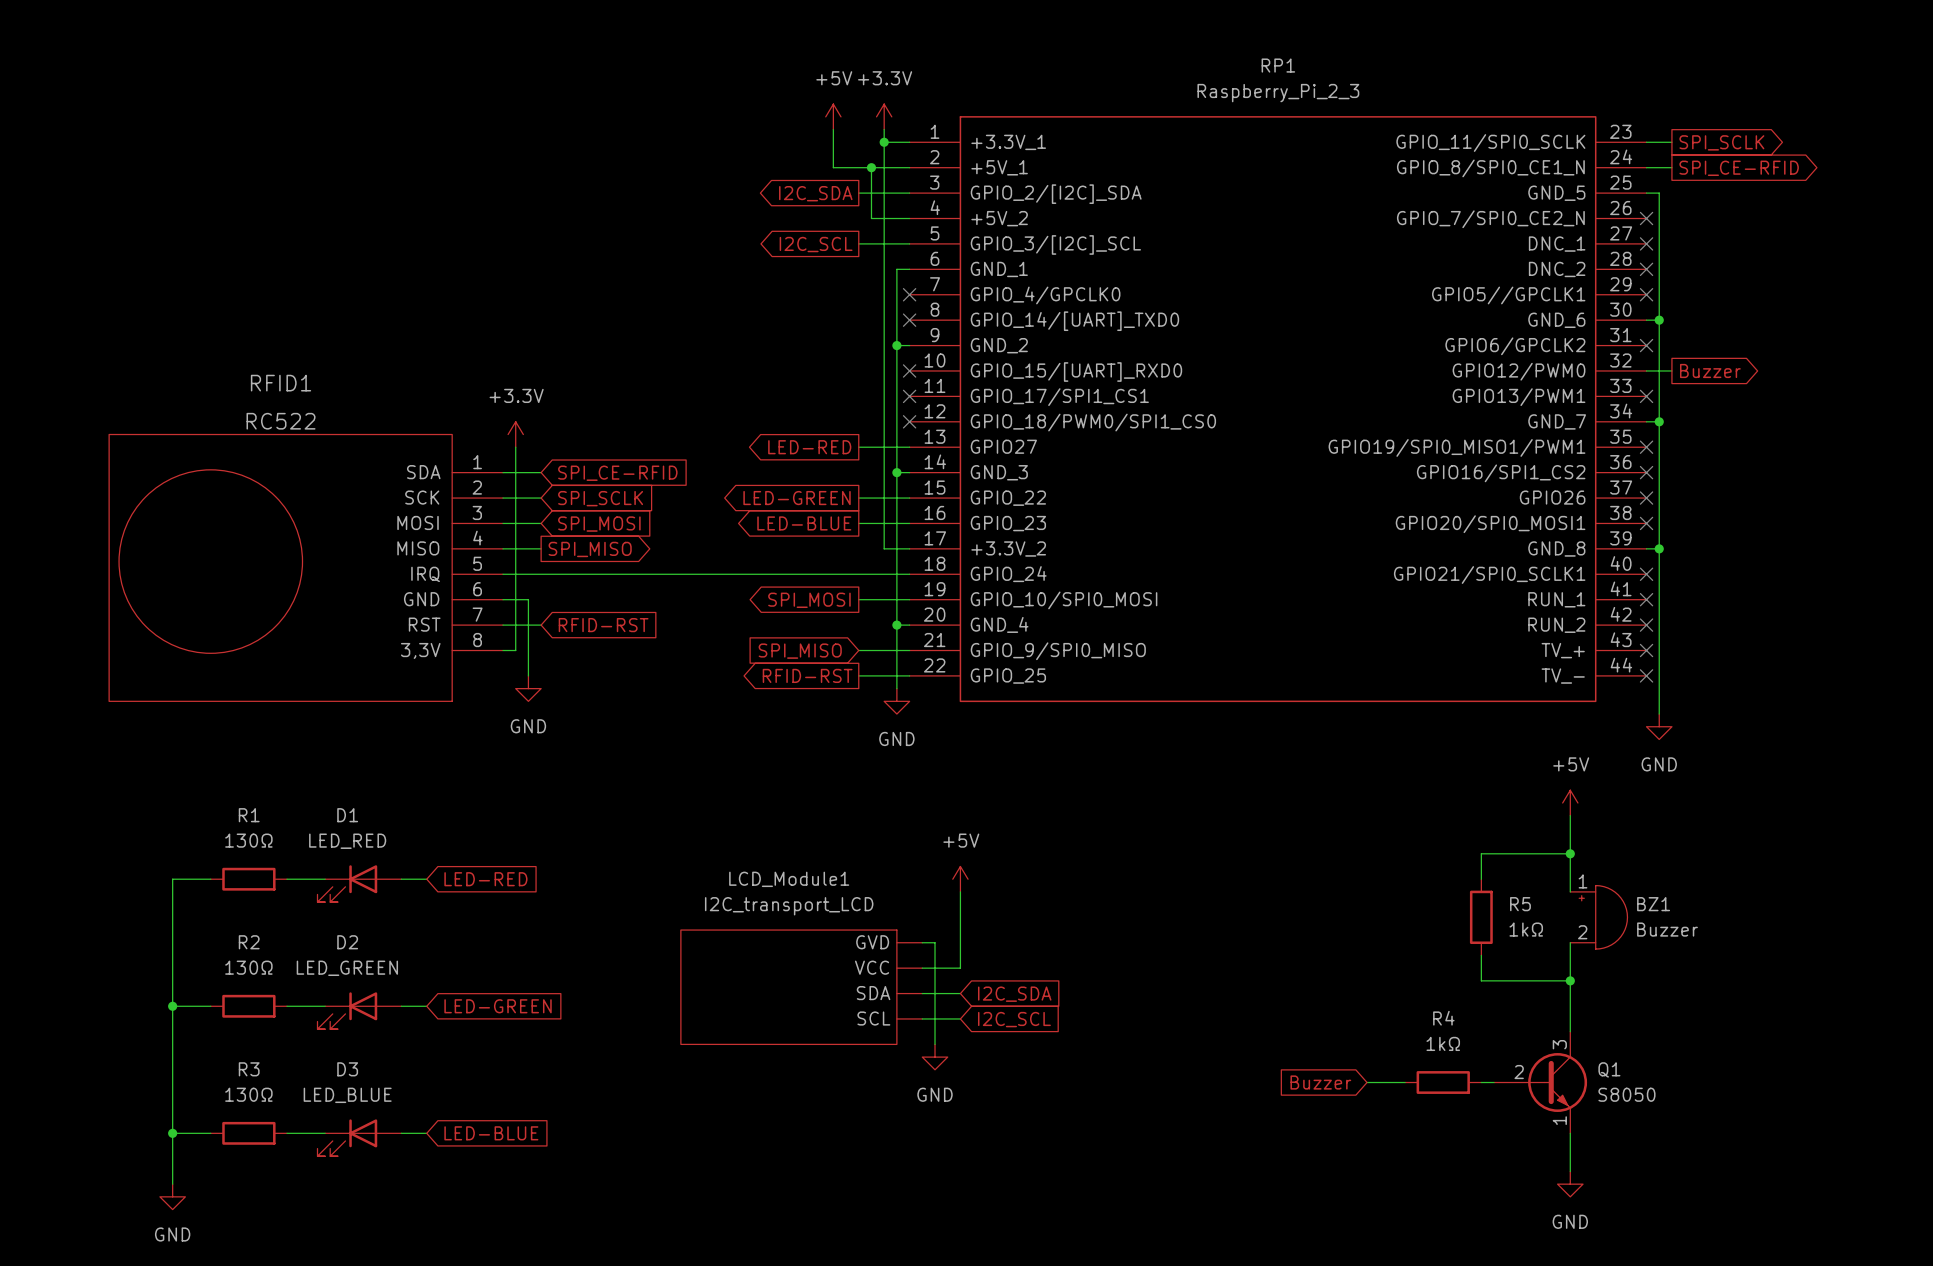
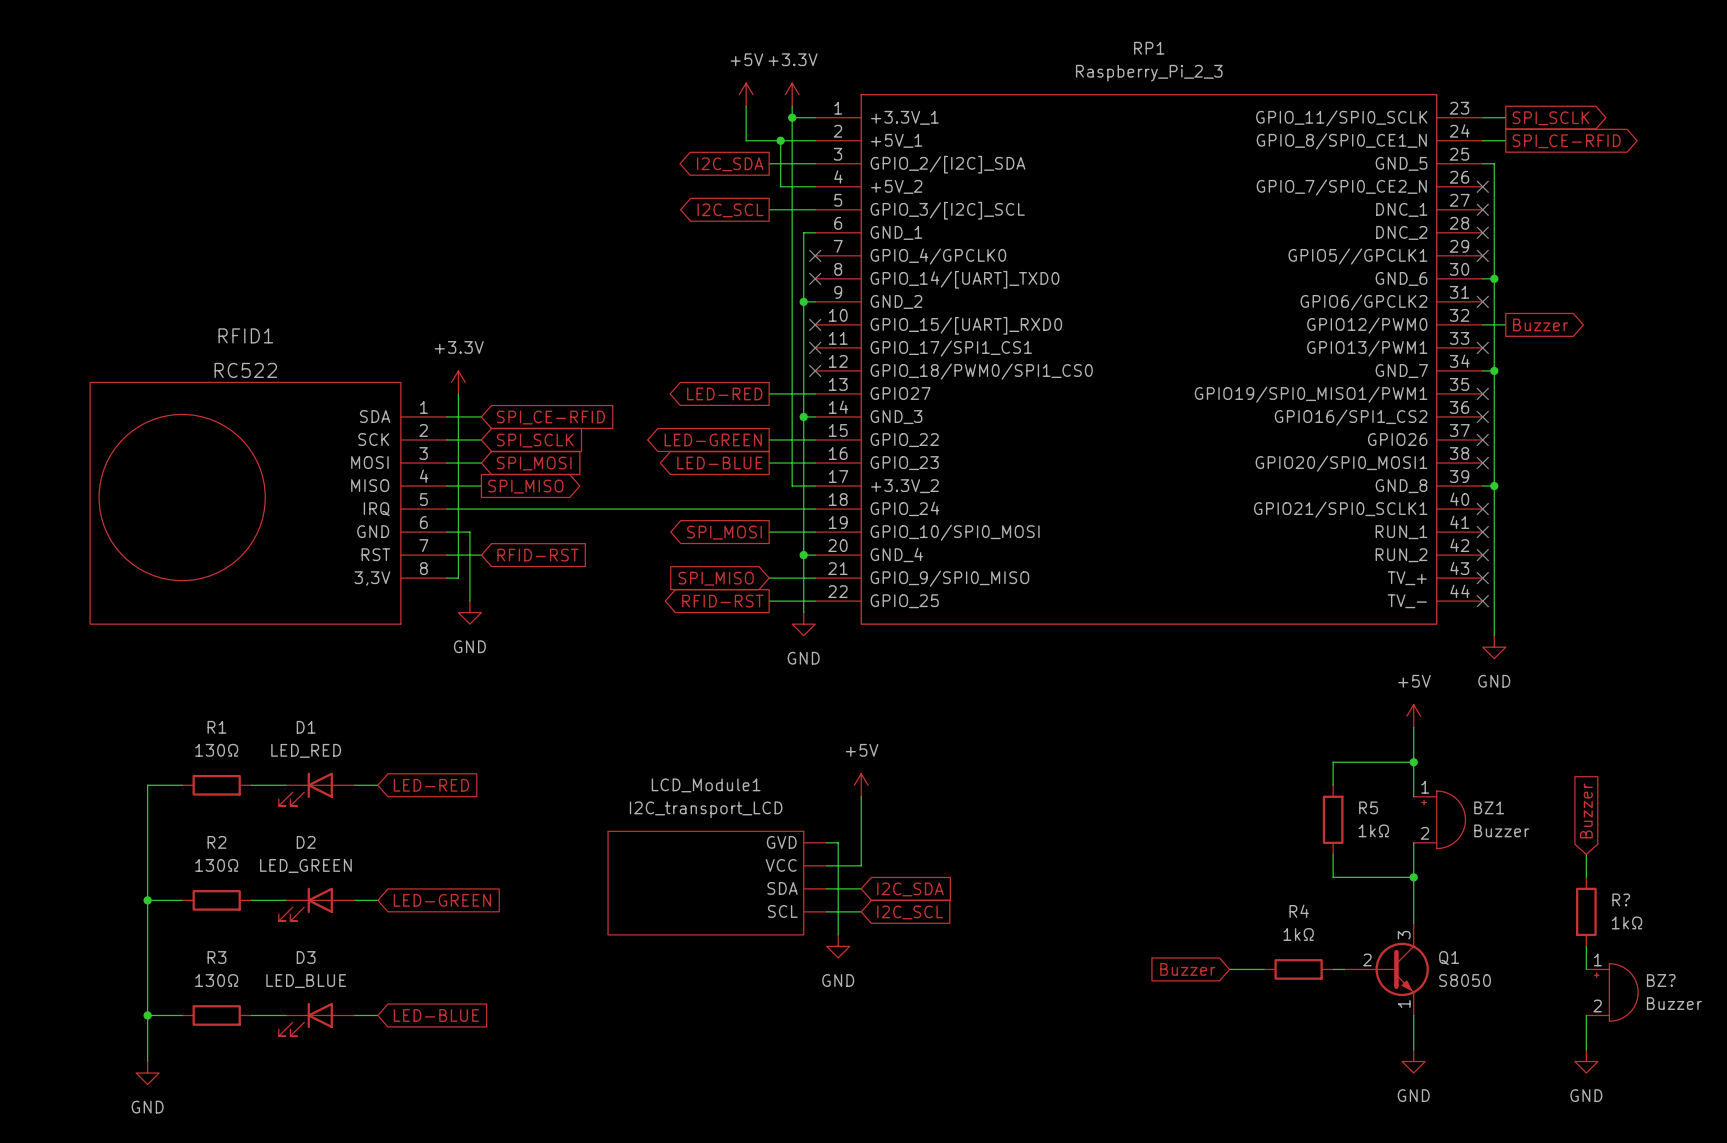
global label: none -> Buzzer (1586, 810)
wire: none -> (1586, 854) (1586, 877)
R?: none -> 1kΩ (1586, 911)
wire: none -> (1586, 946) (1586, 969)
BZ?: none -> Buzzer (1612, 992)
wire: none -> (1586, 1015) (1586, 1050)
power symbol: none -> GND (1586, 1061)

